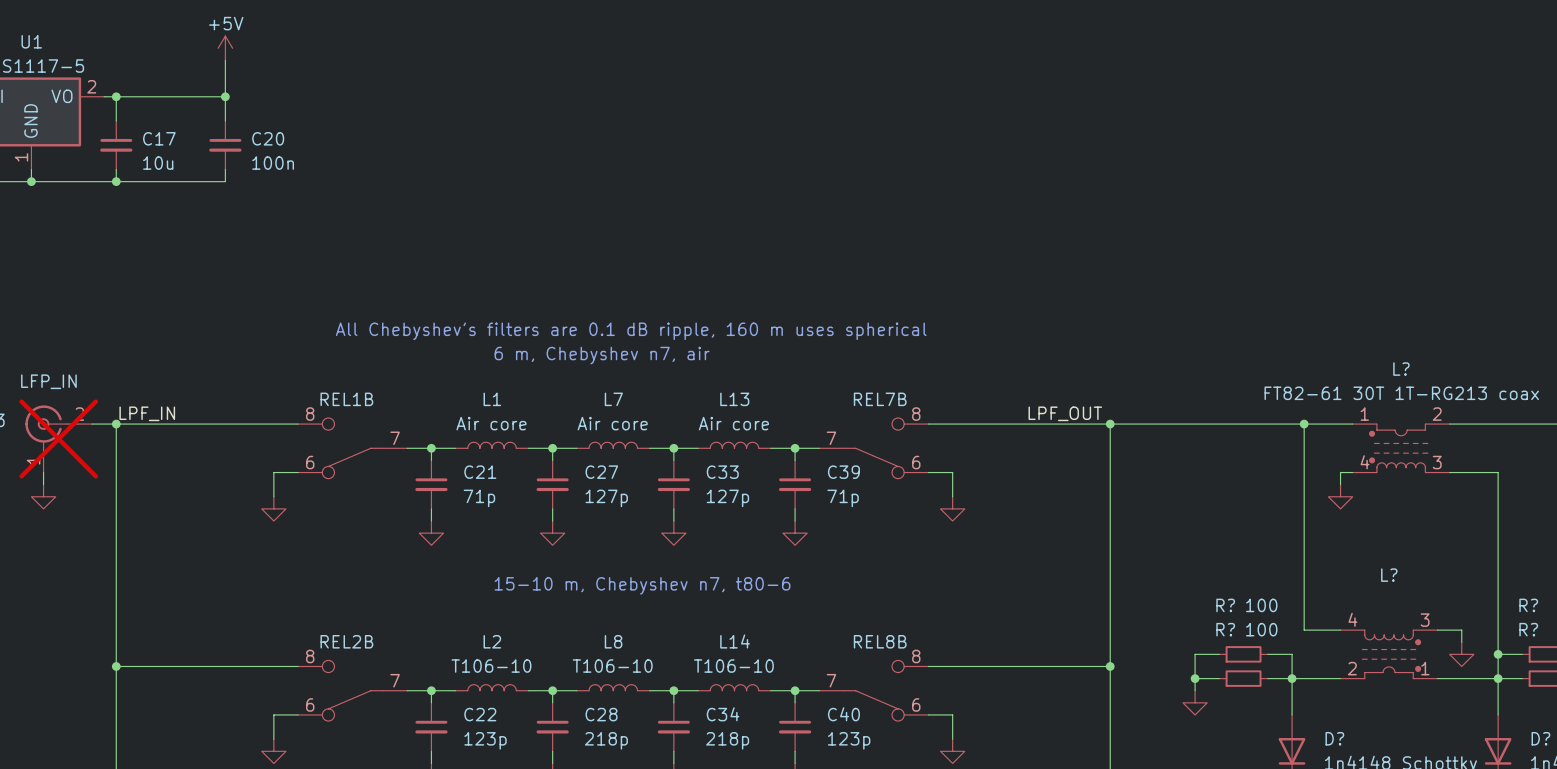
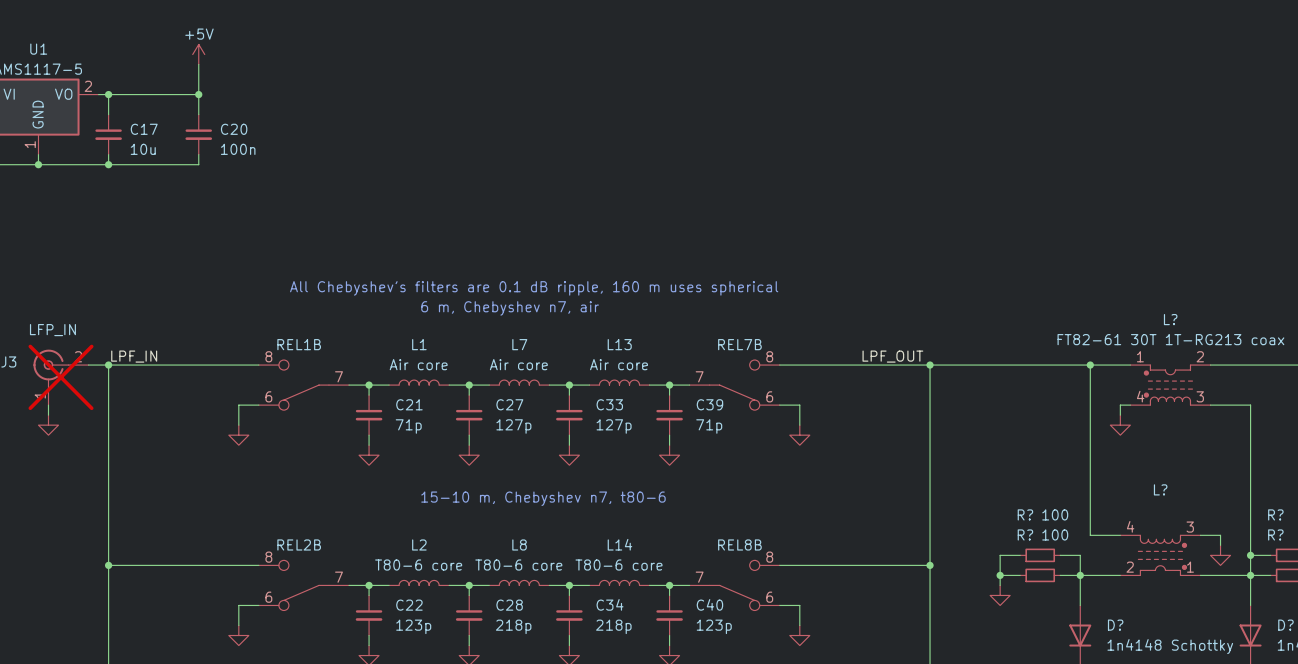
L2 value: T106-10 (491, 666) -> T80-6 core (418, 565)
L8 value: T106-10 (612, 666) -> T80-6 core (518, 565)
L14 value: T106-10 (733, 666) -> T80-6 core (619, 565)

